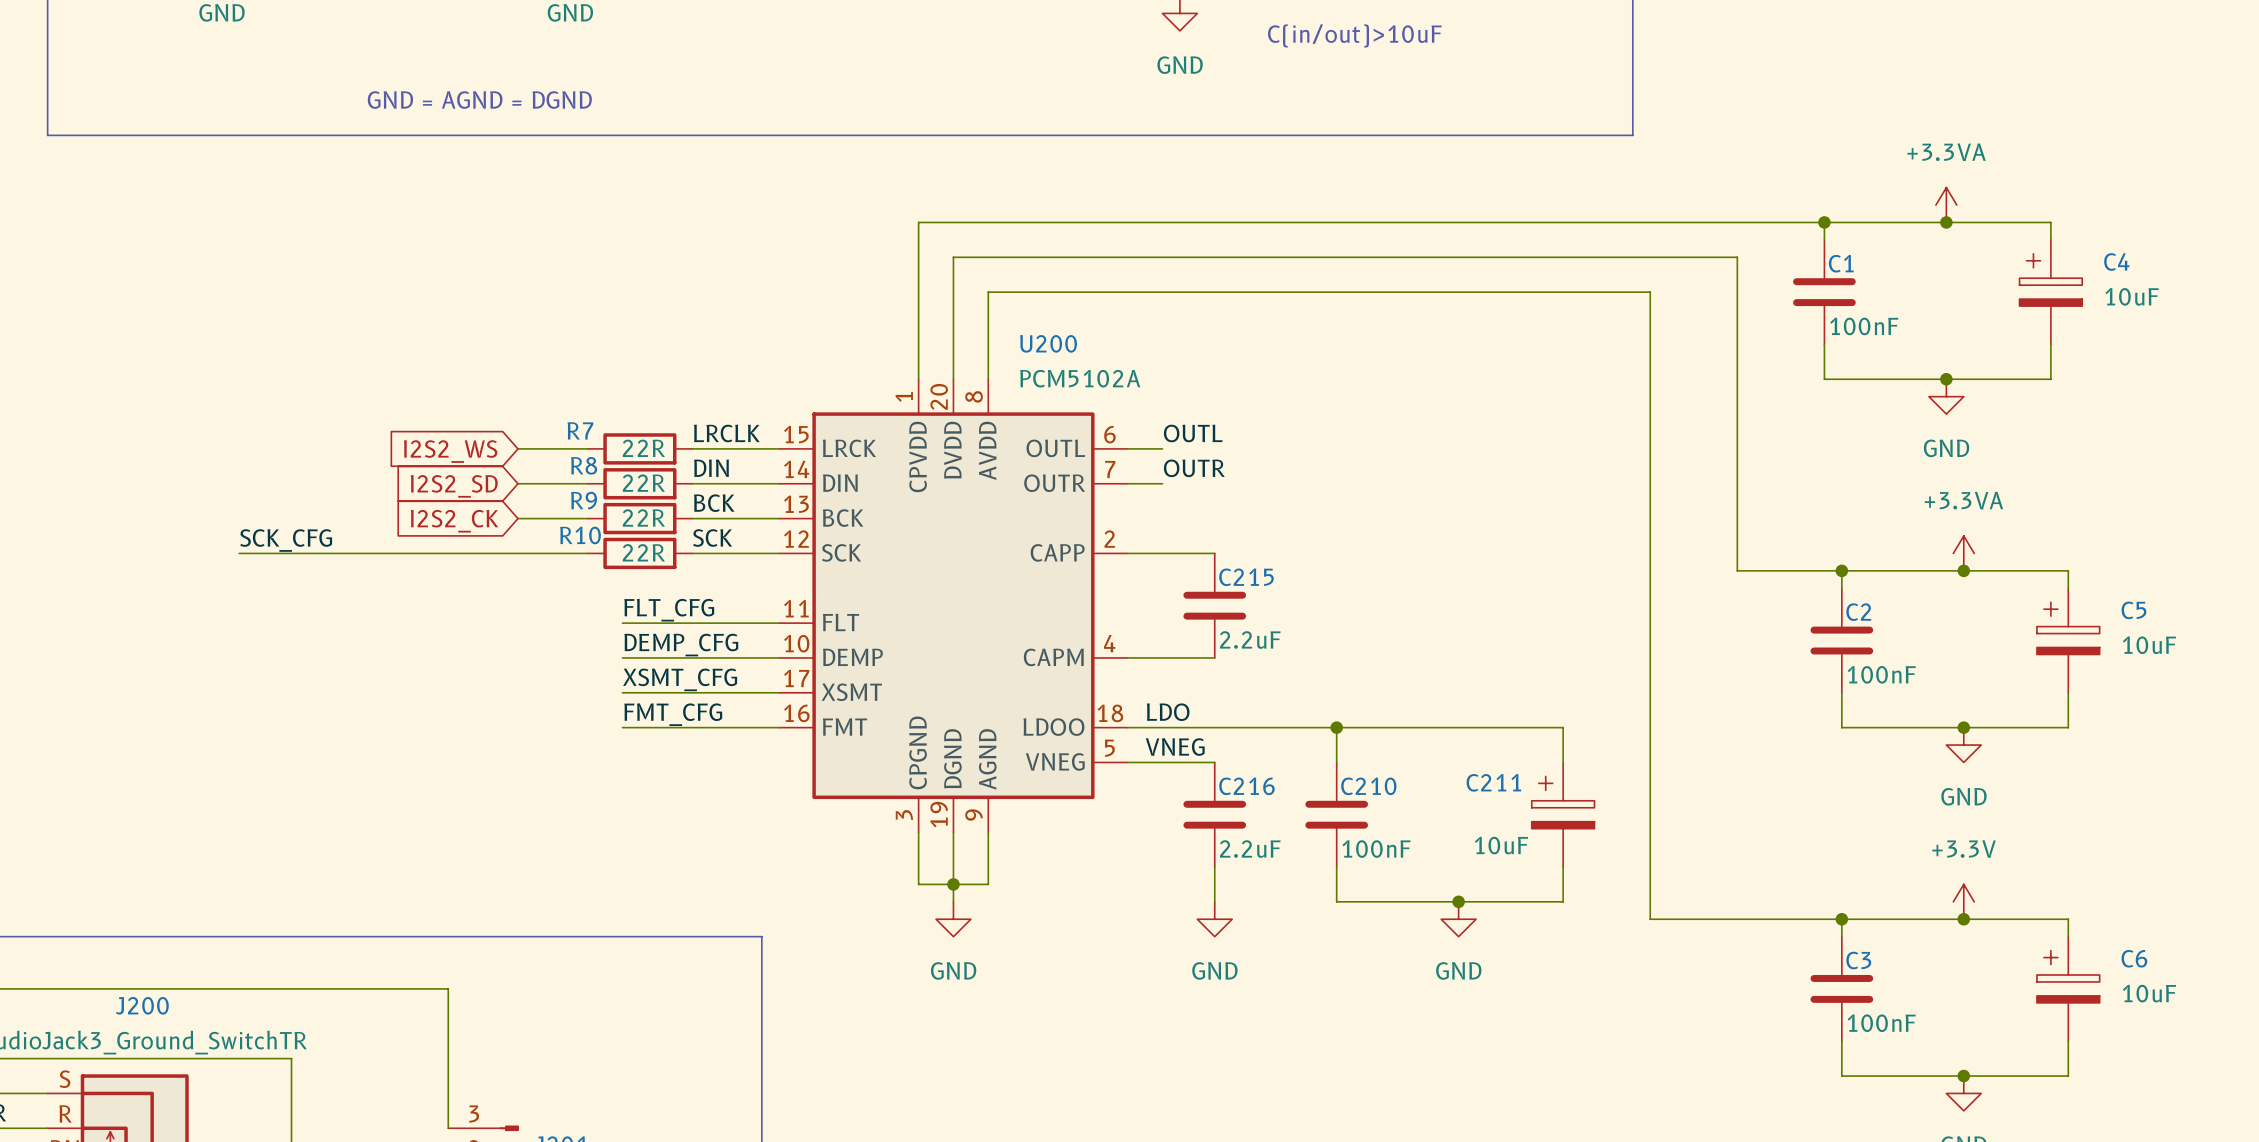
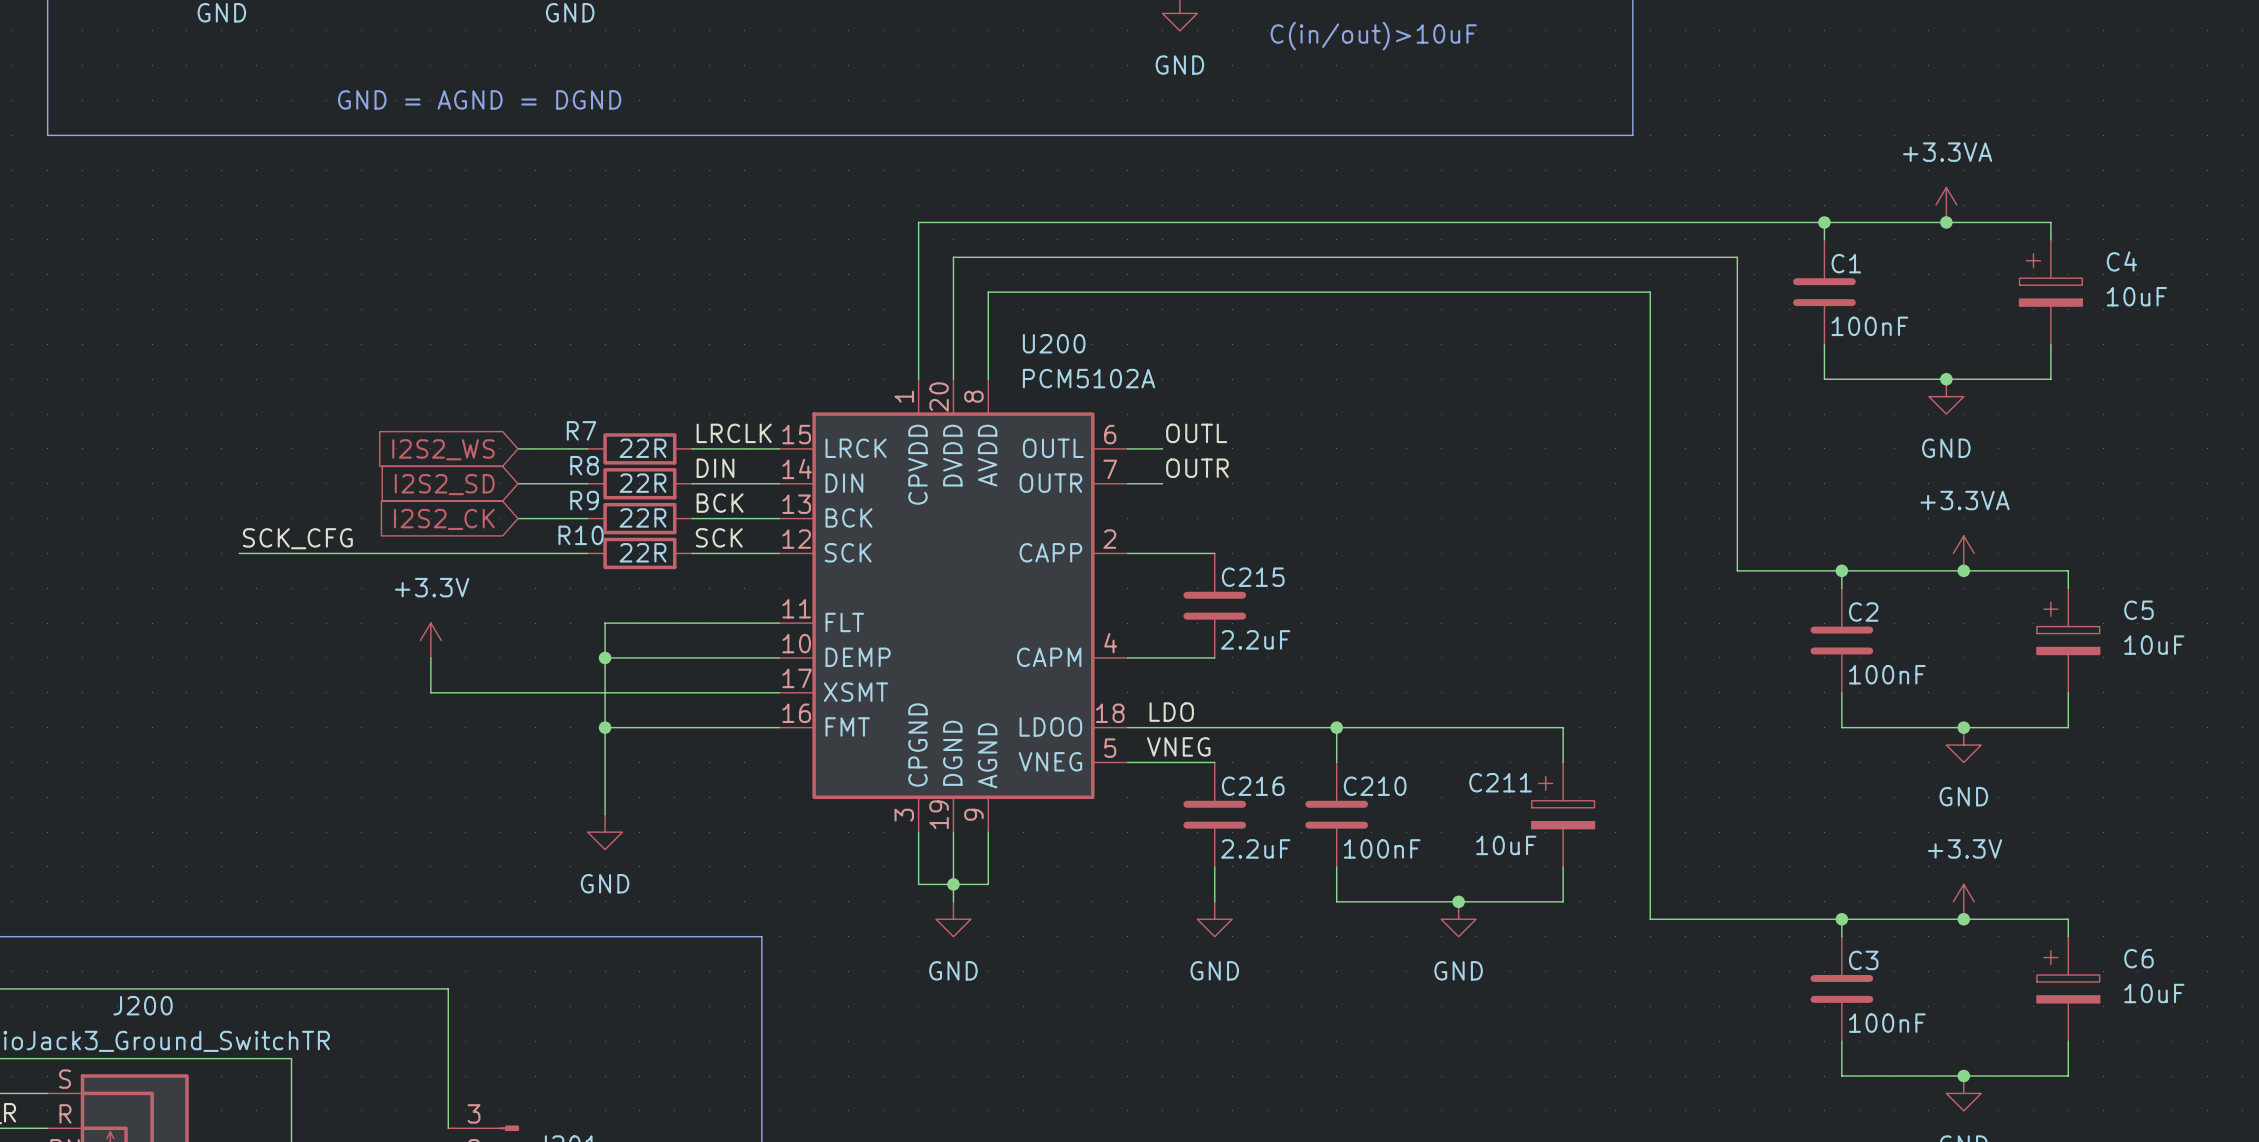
label: FLT_CFG (669, 610) -> none
wire: none -> (622, 623) (605, 623) (605, 814)
power symbol: none -> +3.3V (430, 640)
label: DEMP_CFG (681, 645) -> none
wire: none -> (430, 657) (430, 692) (622, 692)
wire: none -> (605, 657) (622, 657)
junction: none -> (605, 657)
label: XSMT_CFG (680, 679) -> none
label: FMT_CFG (673, 714) -> none
wire: none -> (605, 727) (622, 727)
junction: none -> (605, 727)
power symbol: none -> GND (605, 832)

